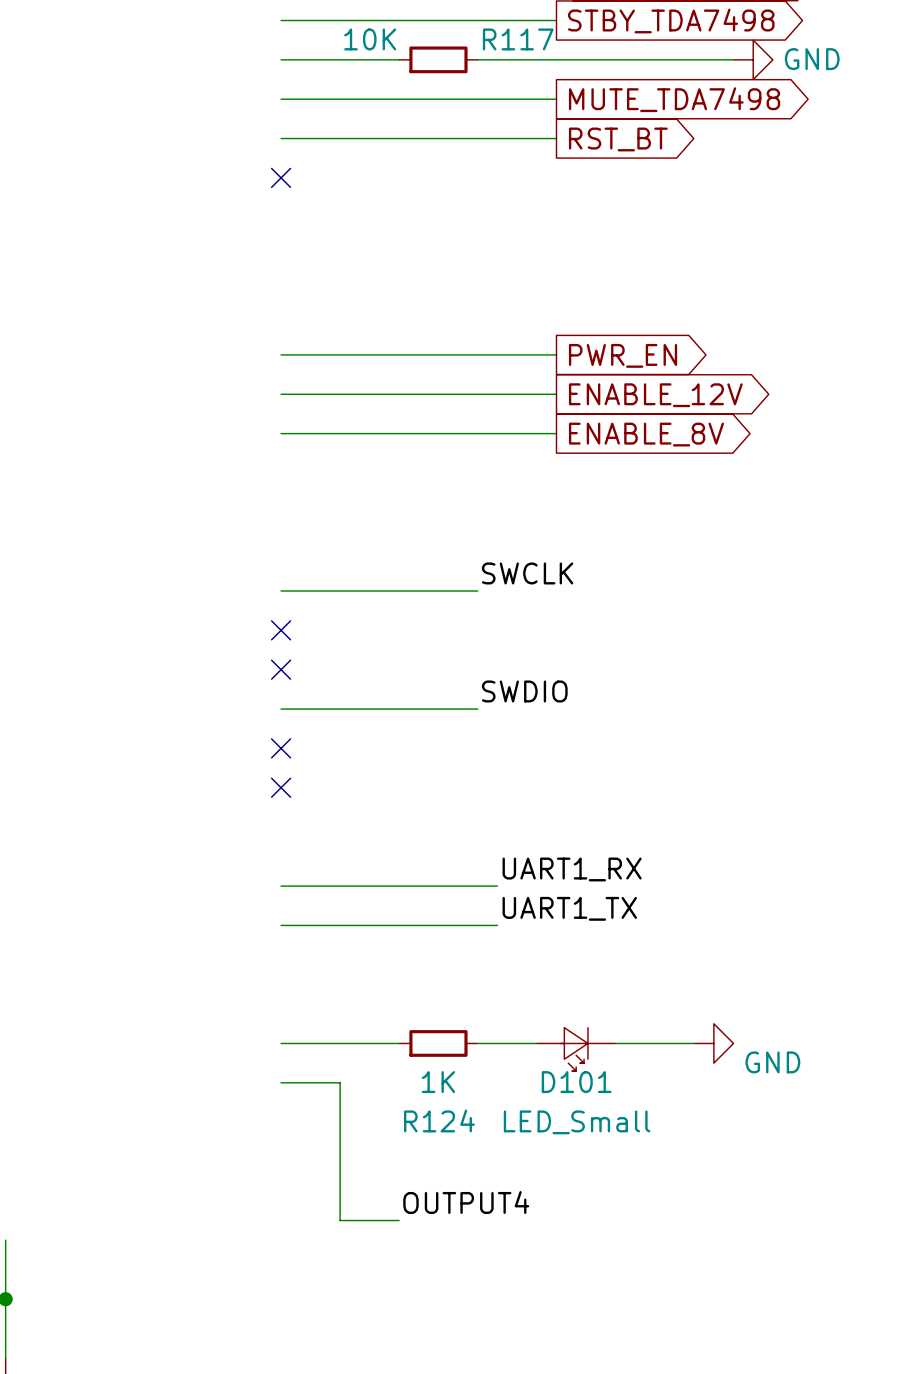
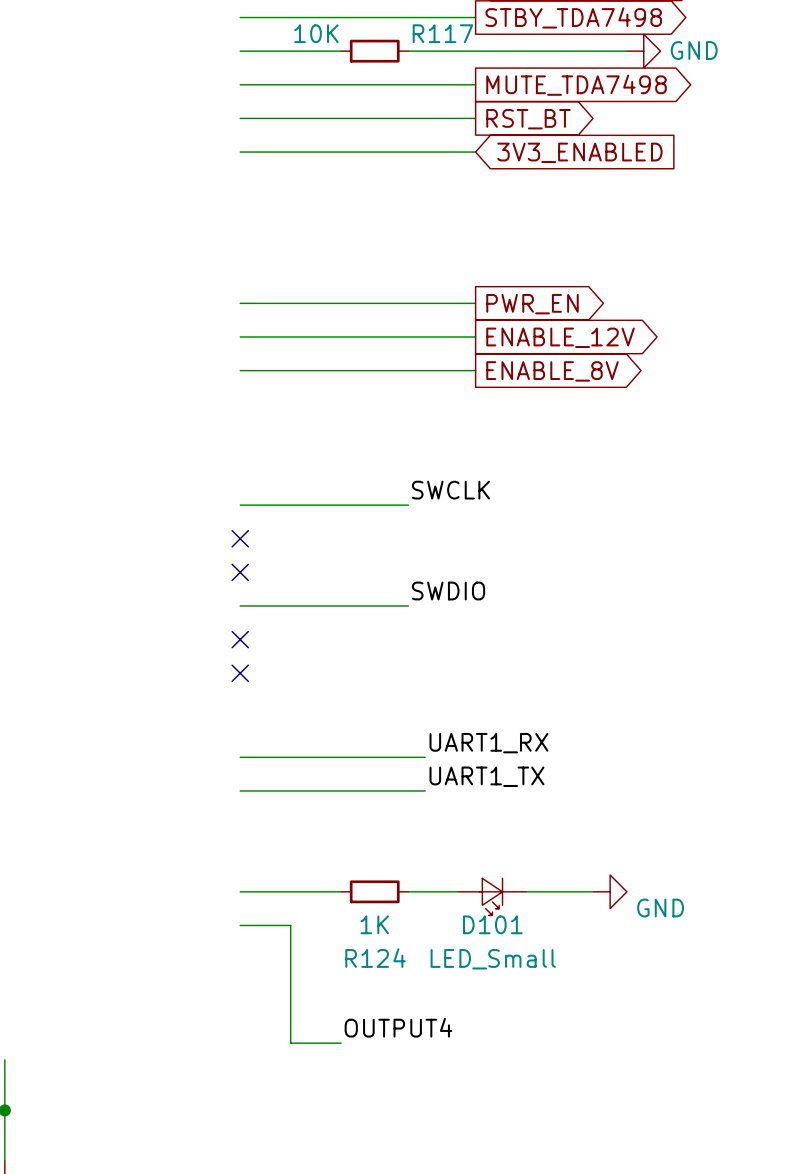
wire: none -> (240, 152) (475, 152)
no-connect mark: (281, 177) -> none
global label: none -> 3V3_ENABLED (579, 152)

